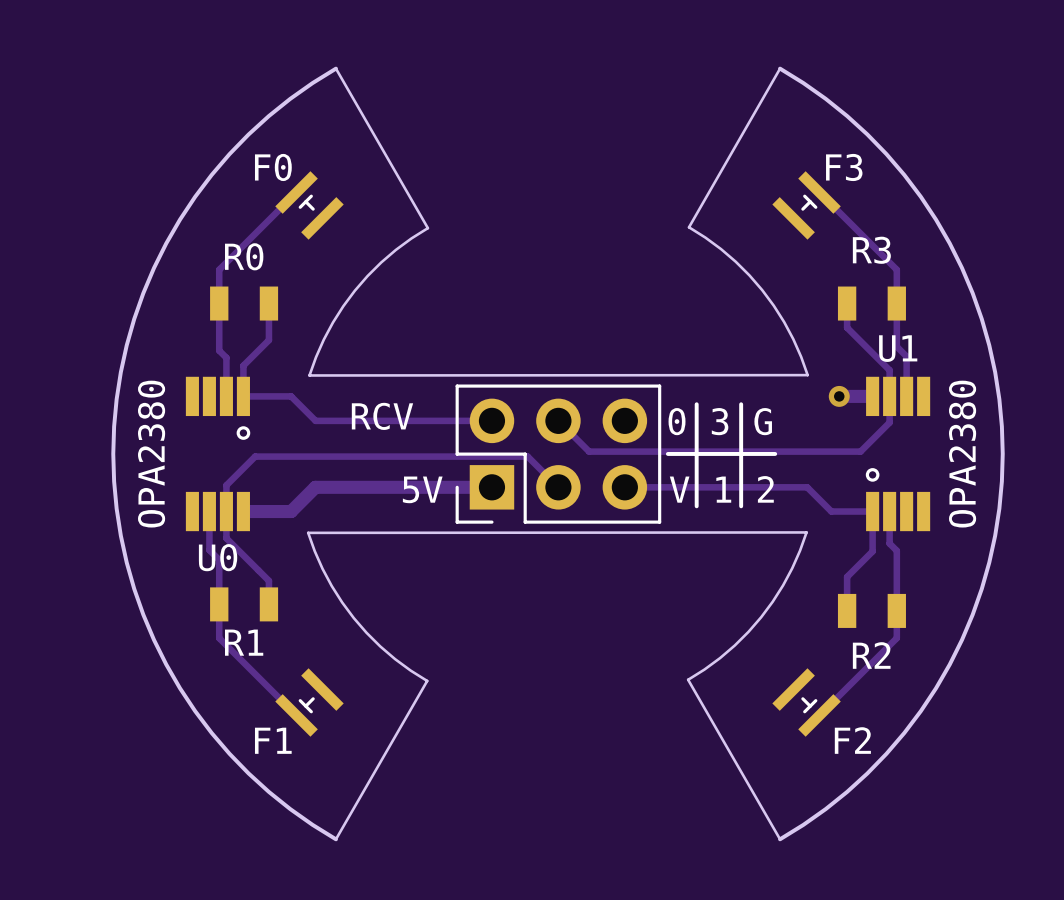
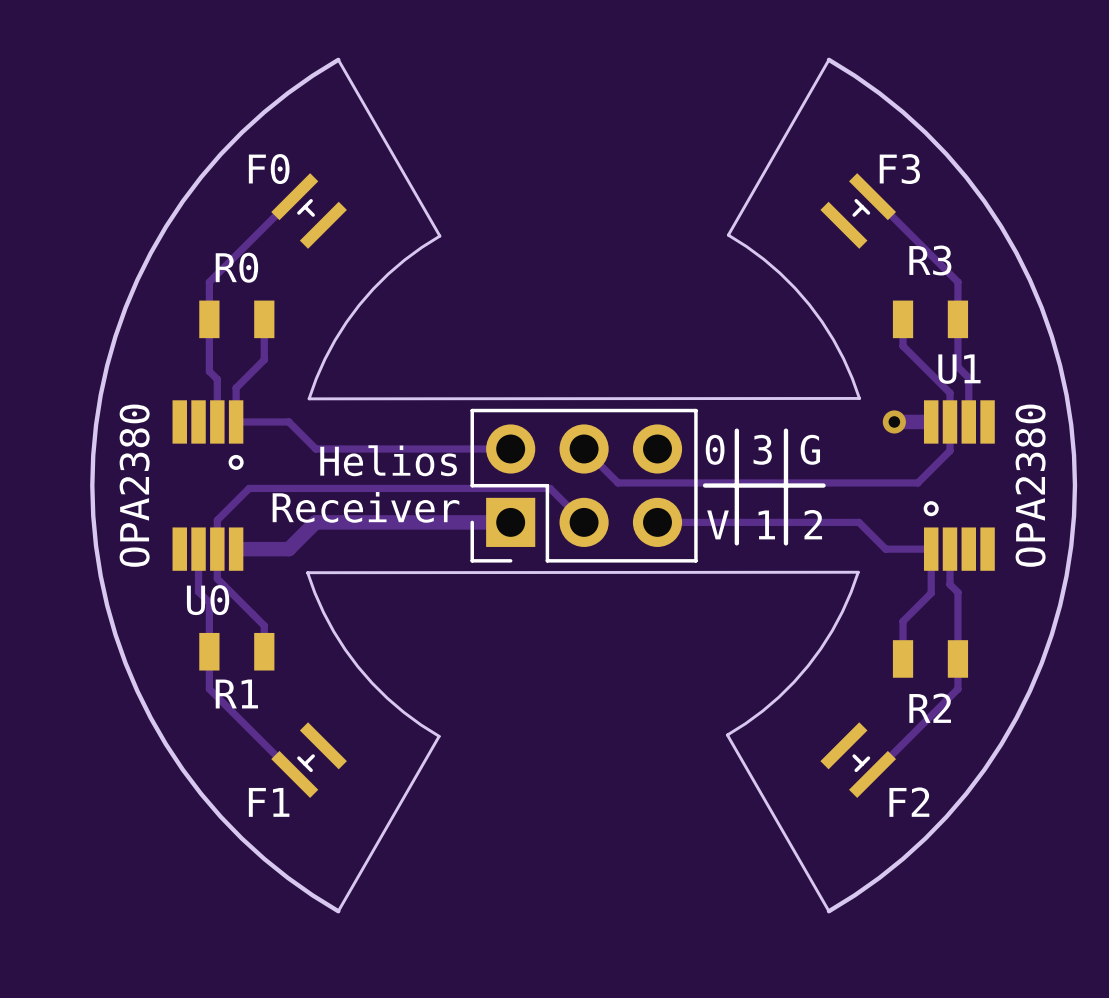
text: RCV (382, 416) -> none
text: none -> Helios (388, 460)
text: none -> Receiver (365, 507)
text: 5V (422, 489) -> none

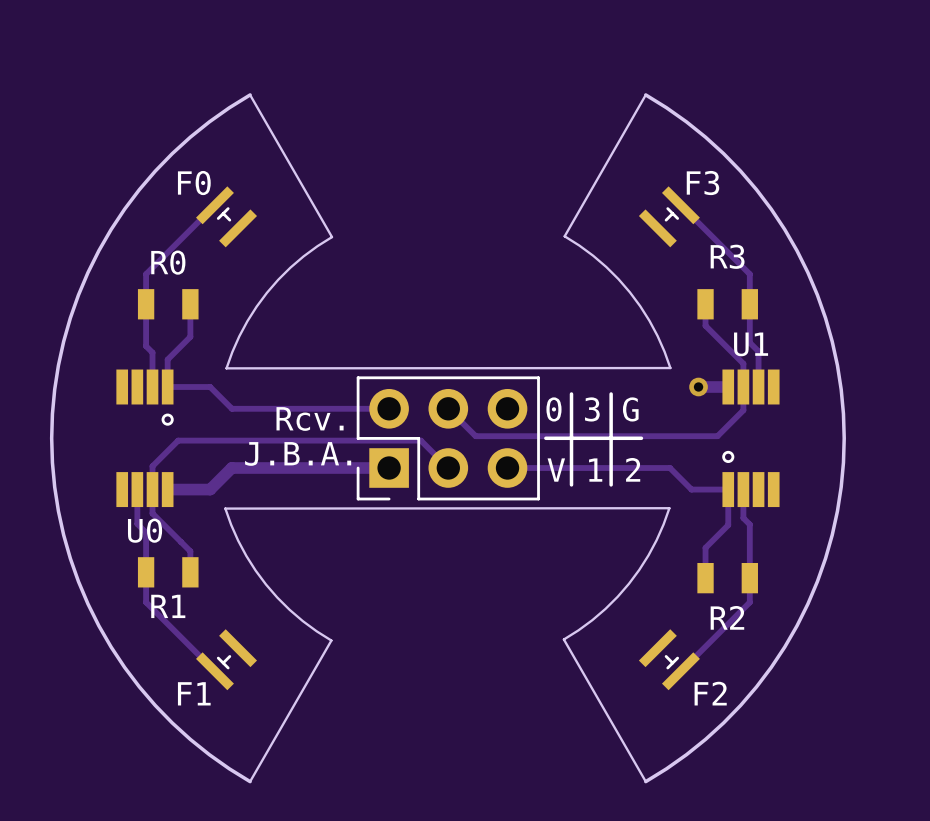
text: Helios (388, 460) -> none
text: none -> Rcv. (310, 418)
U0 value: OPA2380 (134, 485) -> none
U1 value: OPA2380 (1030, 485) -> none
text: none -> J.B.A. (298, 453)
text: Receiver (365, 507) -> none

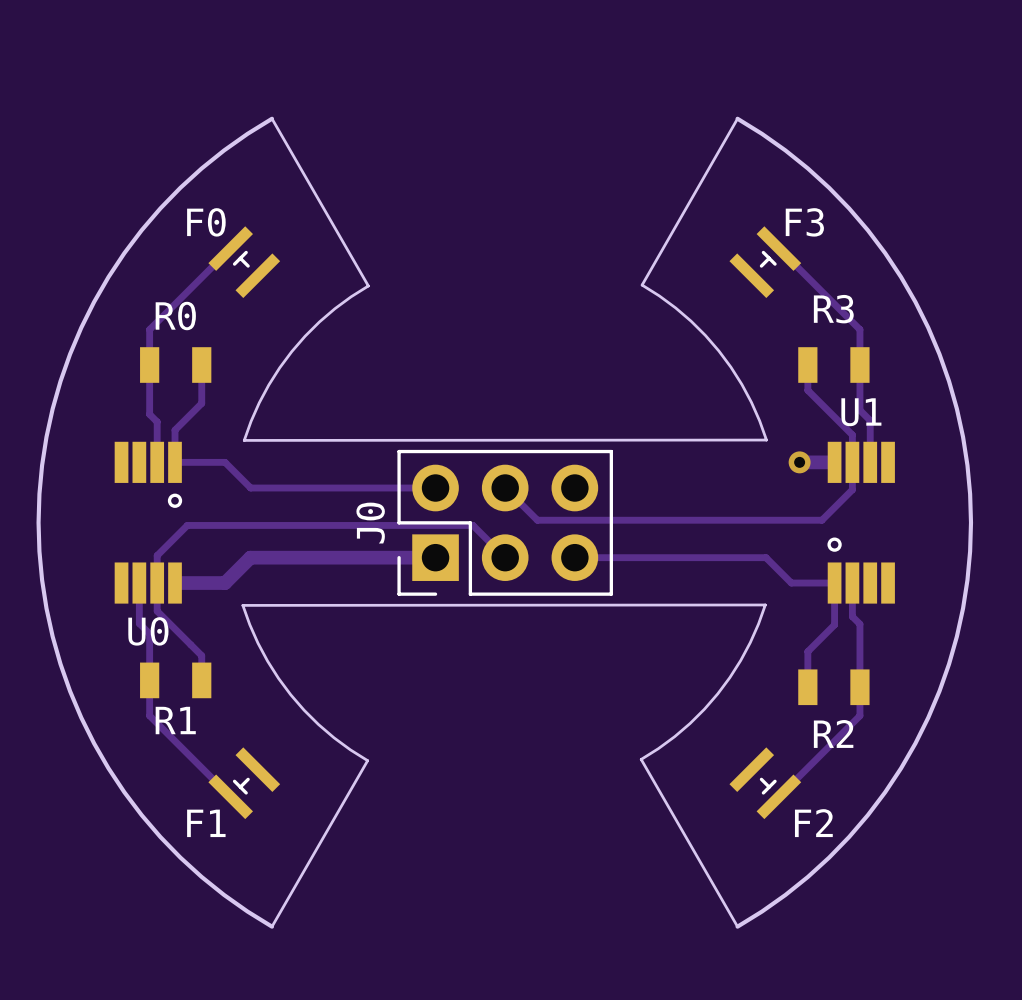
line: (571, 393) (571, 484) -> none
line: (611, 393) (611, 484) -> none
text: 0 3 G (592, 409) -> none
text: Rcv. (310, 418) -> none
J0 name: none -> J0 (370, 523)
line: (545, 438) (641, 438) -> none
text: J.B.A. (298, 453) -> none
text: V 1 2 (593, 469) -> none

